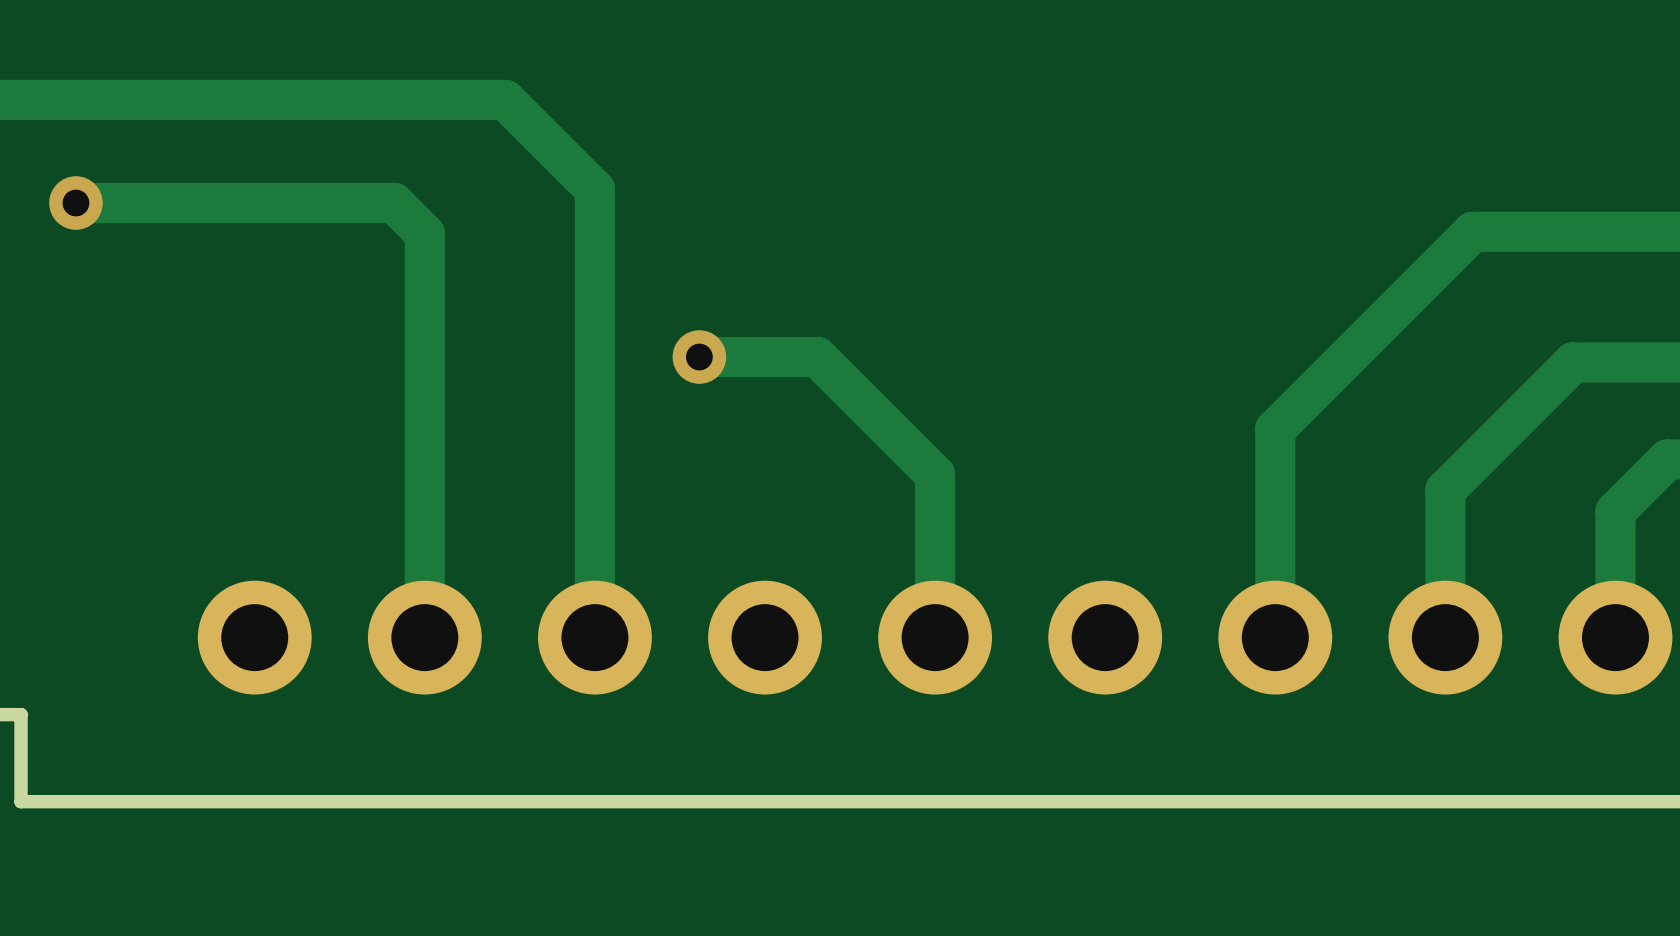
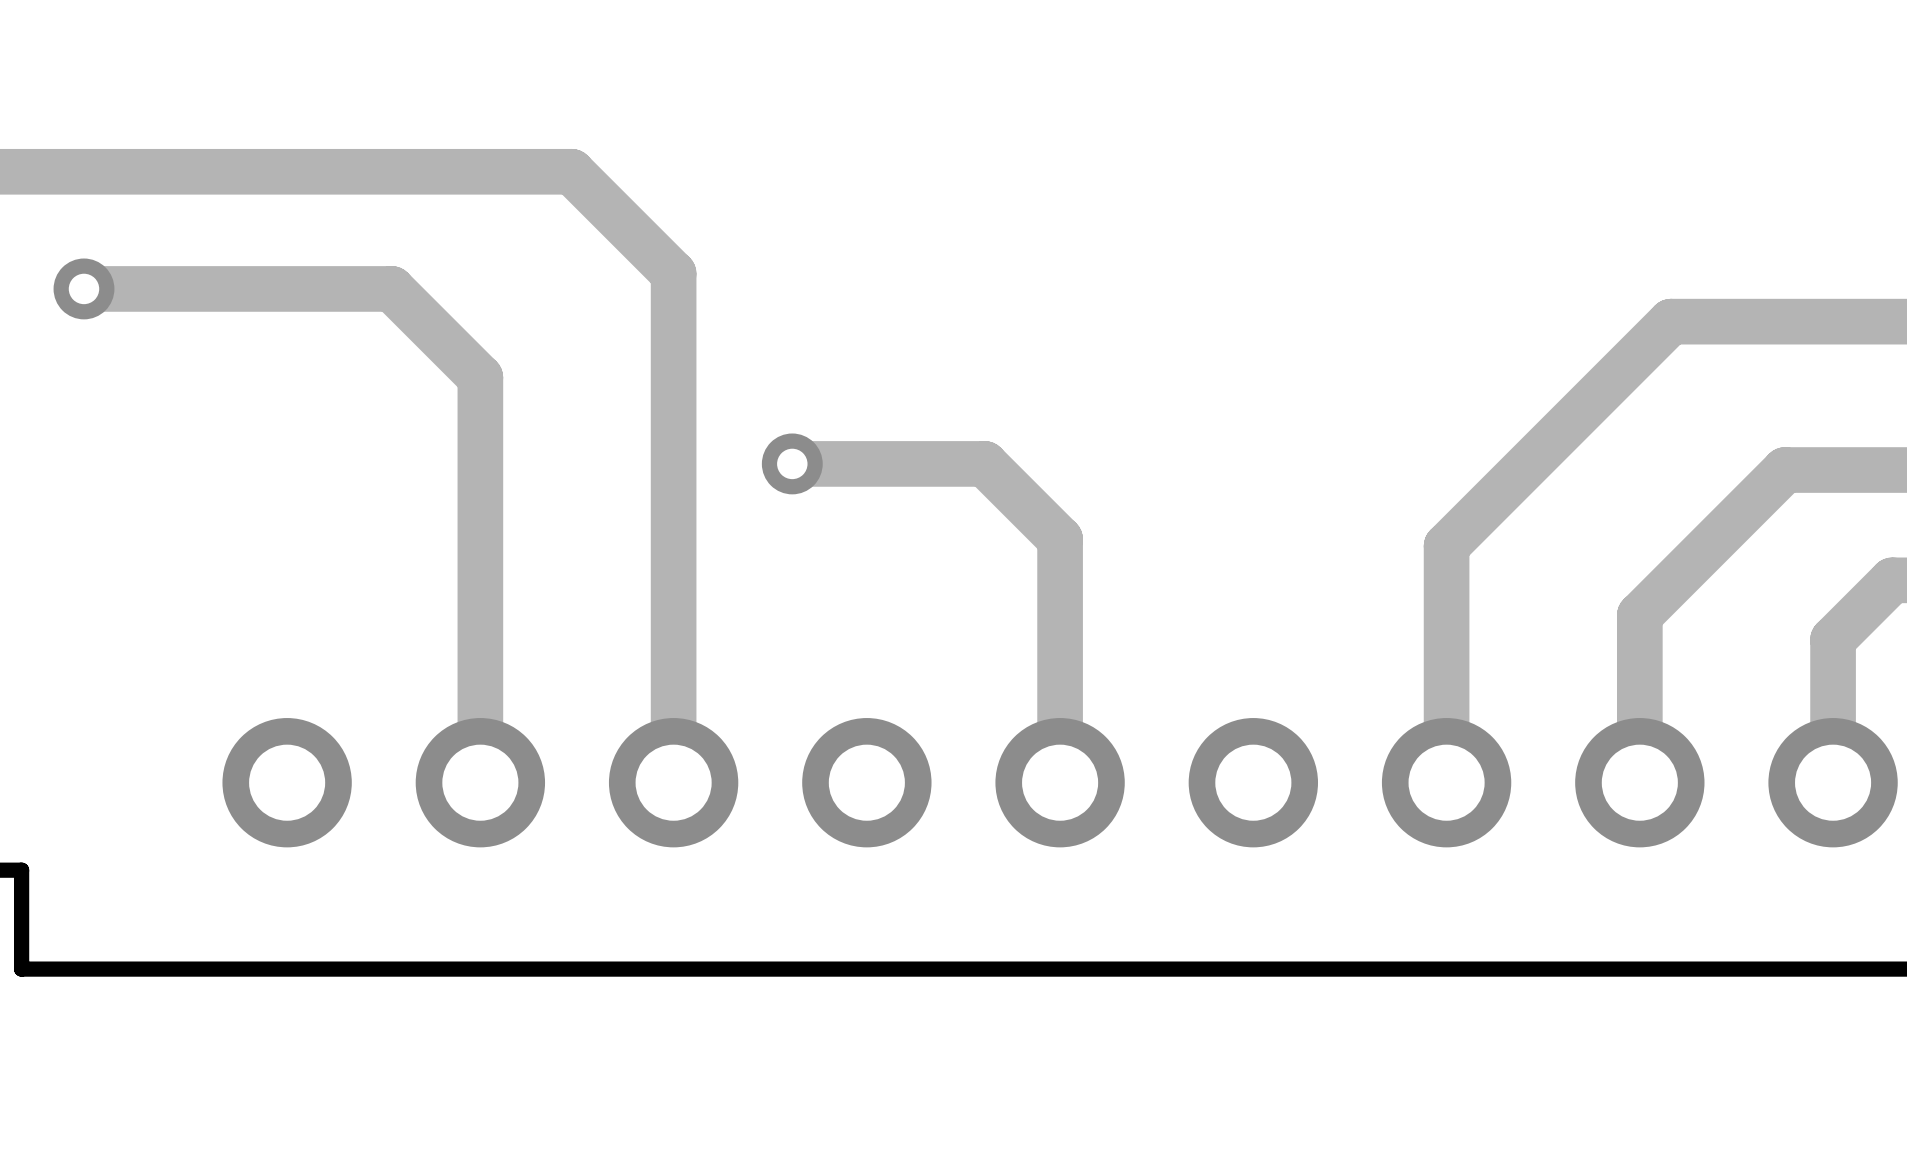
track: (346, 203) (394, 203) (424, 233) (424, 281) -> (391, 288) (480, 377)
track: (817, 357) (935, 474) -> (926, 463) (984, 463) (1060, 539) (1060, 597)

